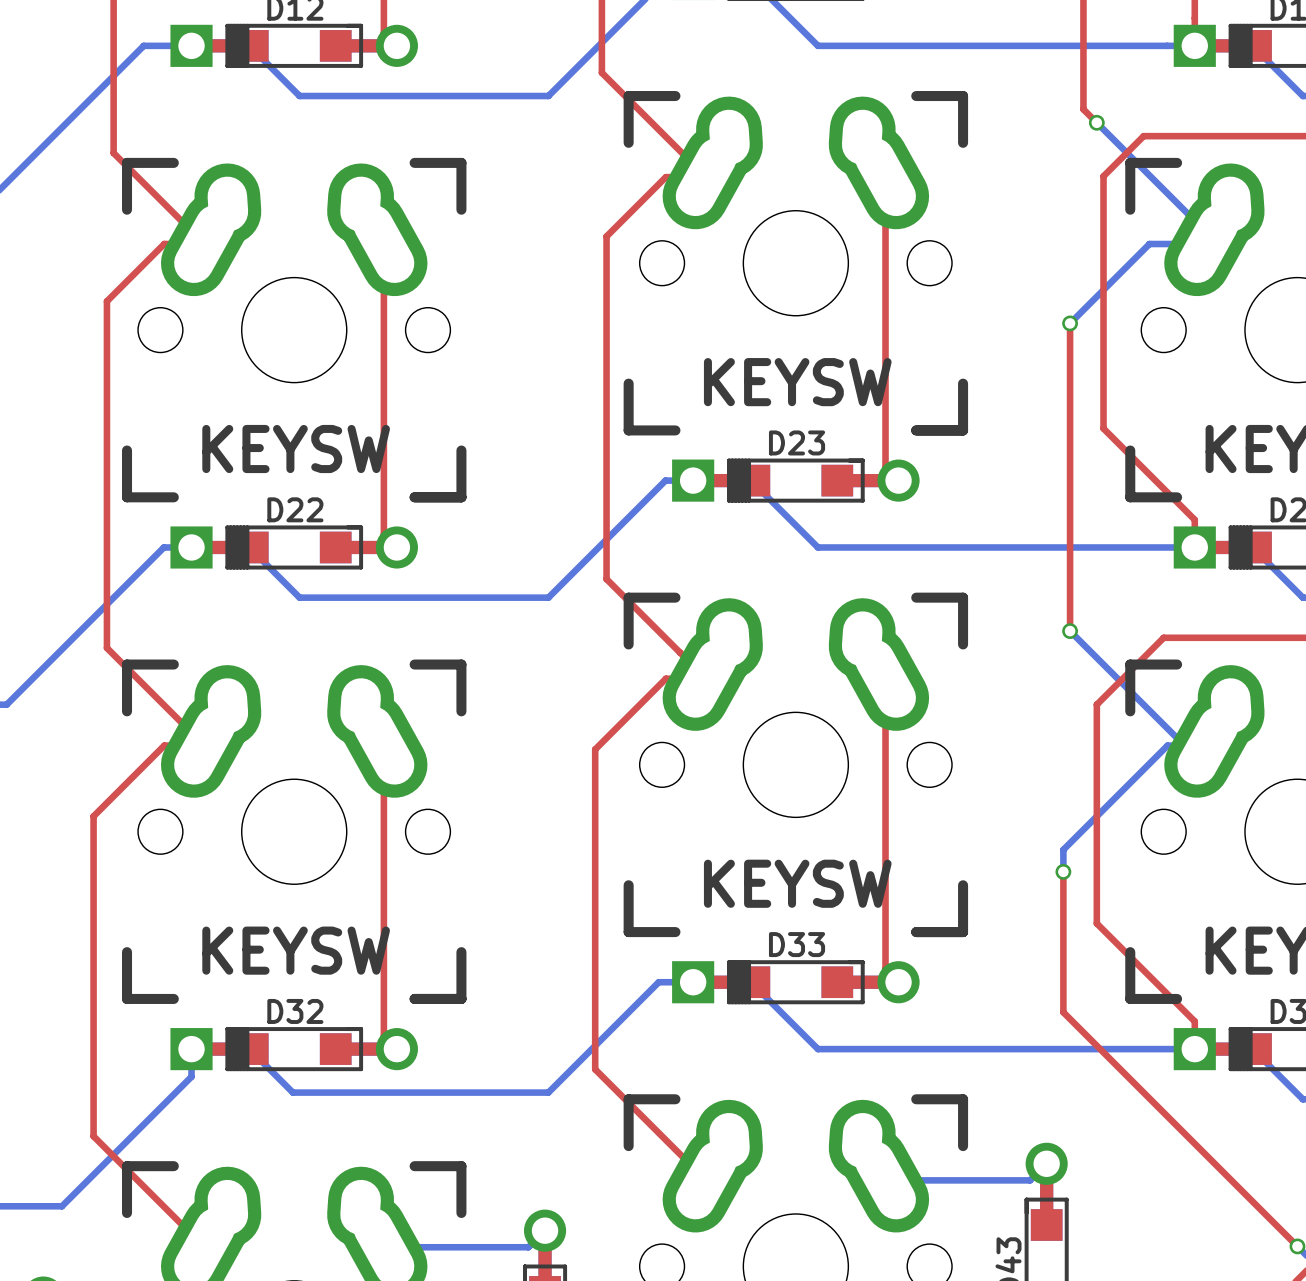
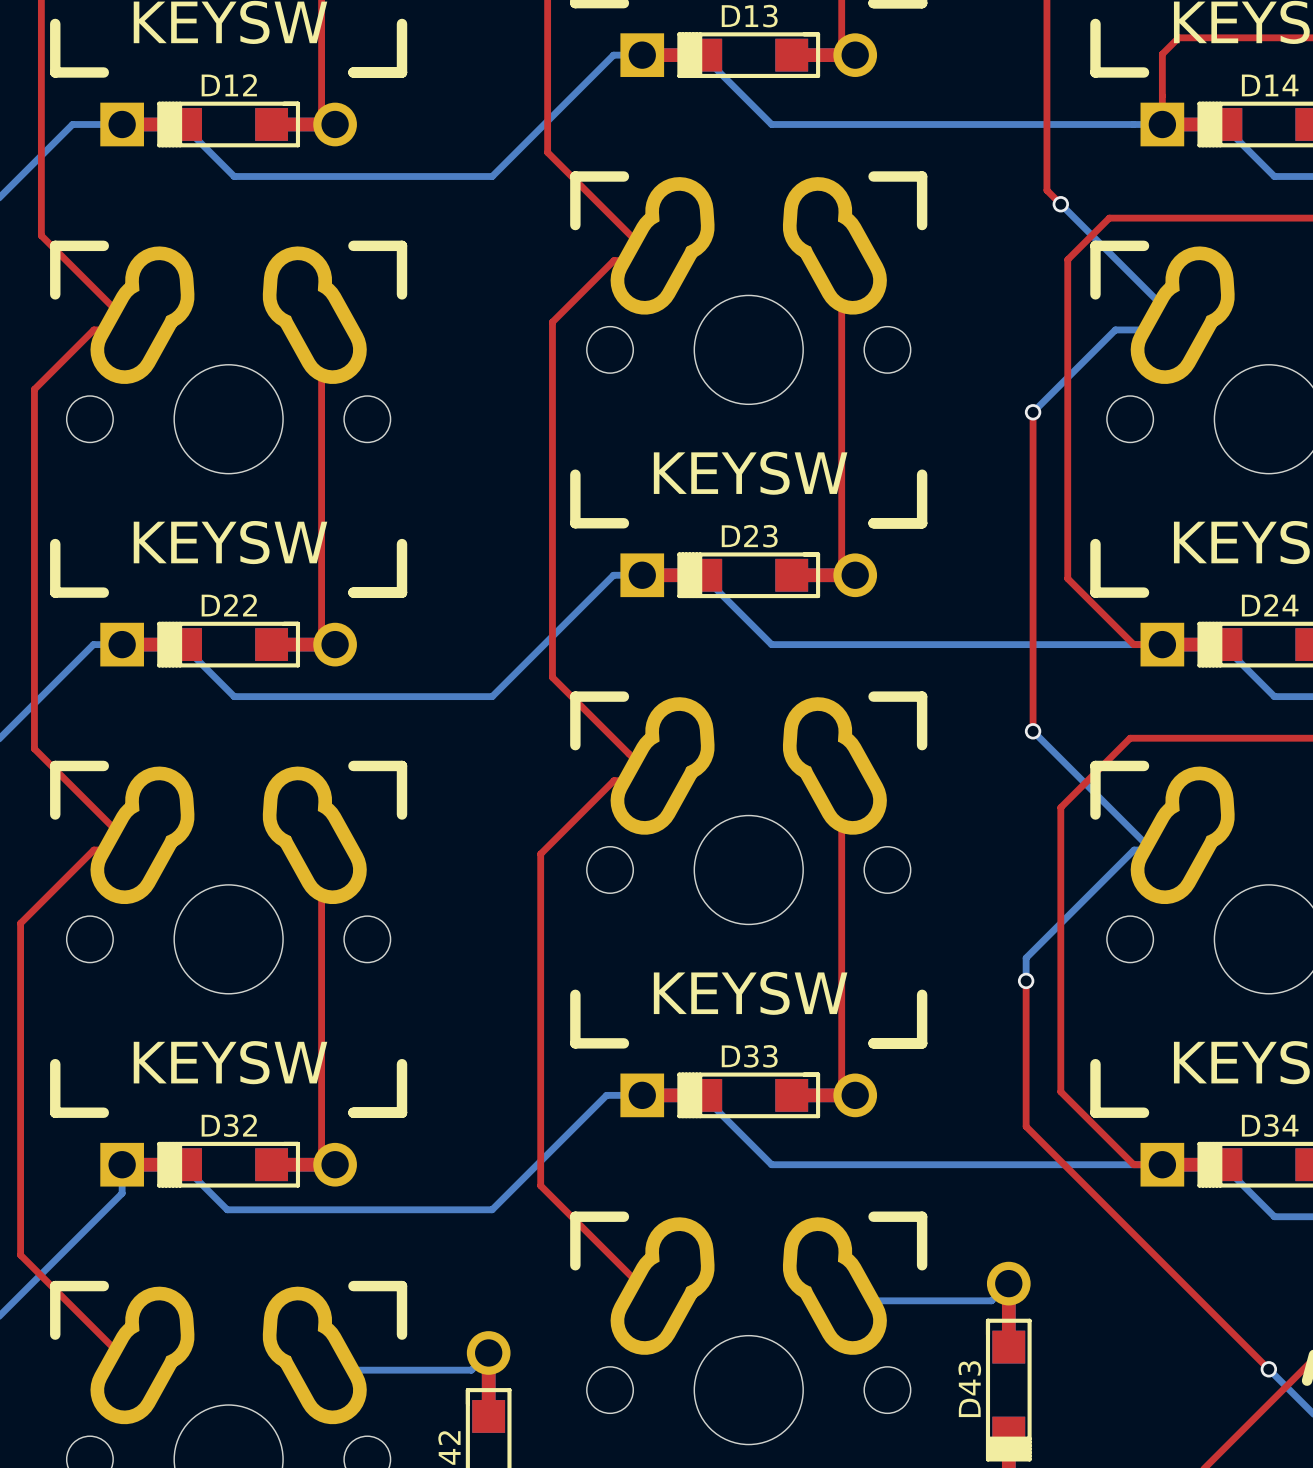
top track: (1103, 428) (1194, 519) (1194, 547) -> (1067, 521) (1067, 578) (1133, 644) (1162, 644)
top track: (1096, 923) (1194, 1021) (1194, 1049) -> (1060, 1034) (1060, 1091) (1133, 1164) (1162, 1164)

